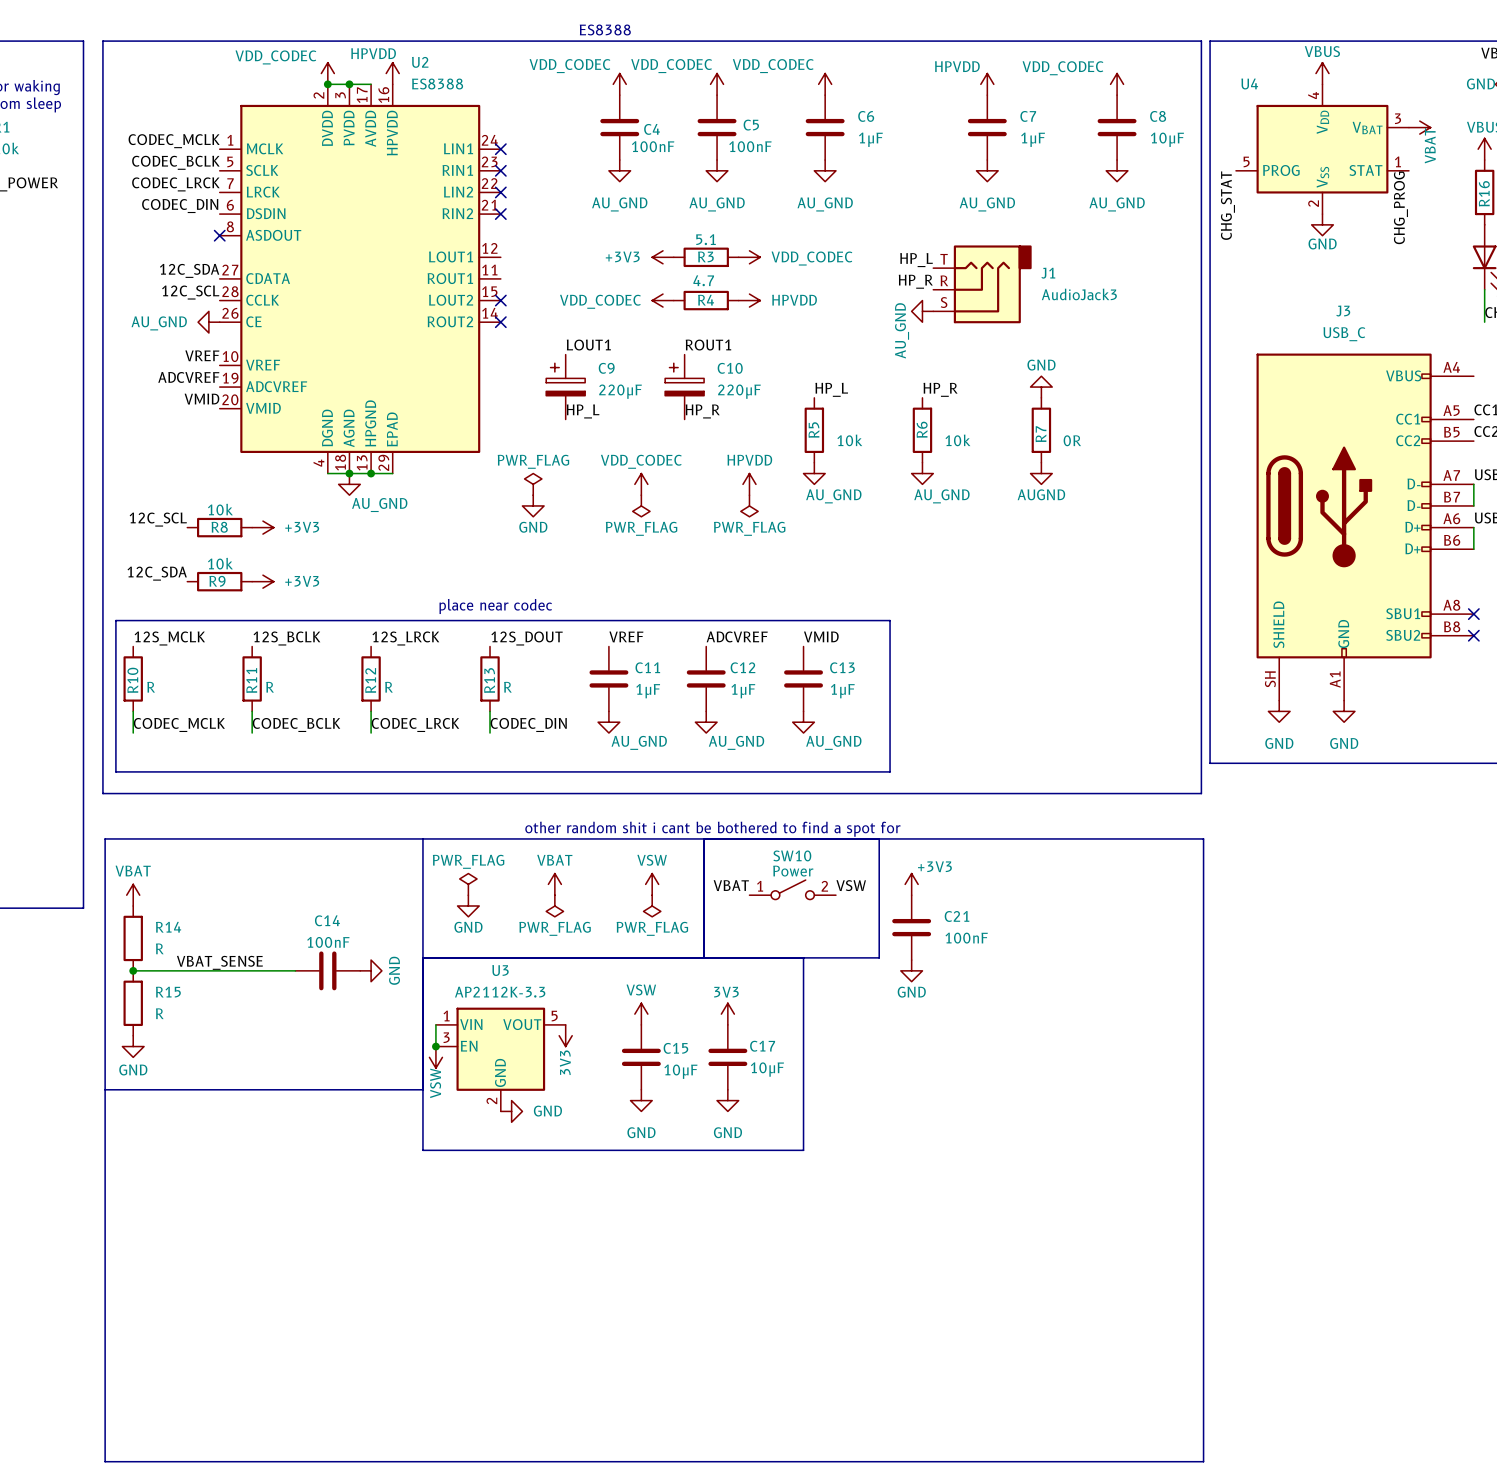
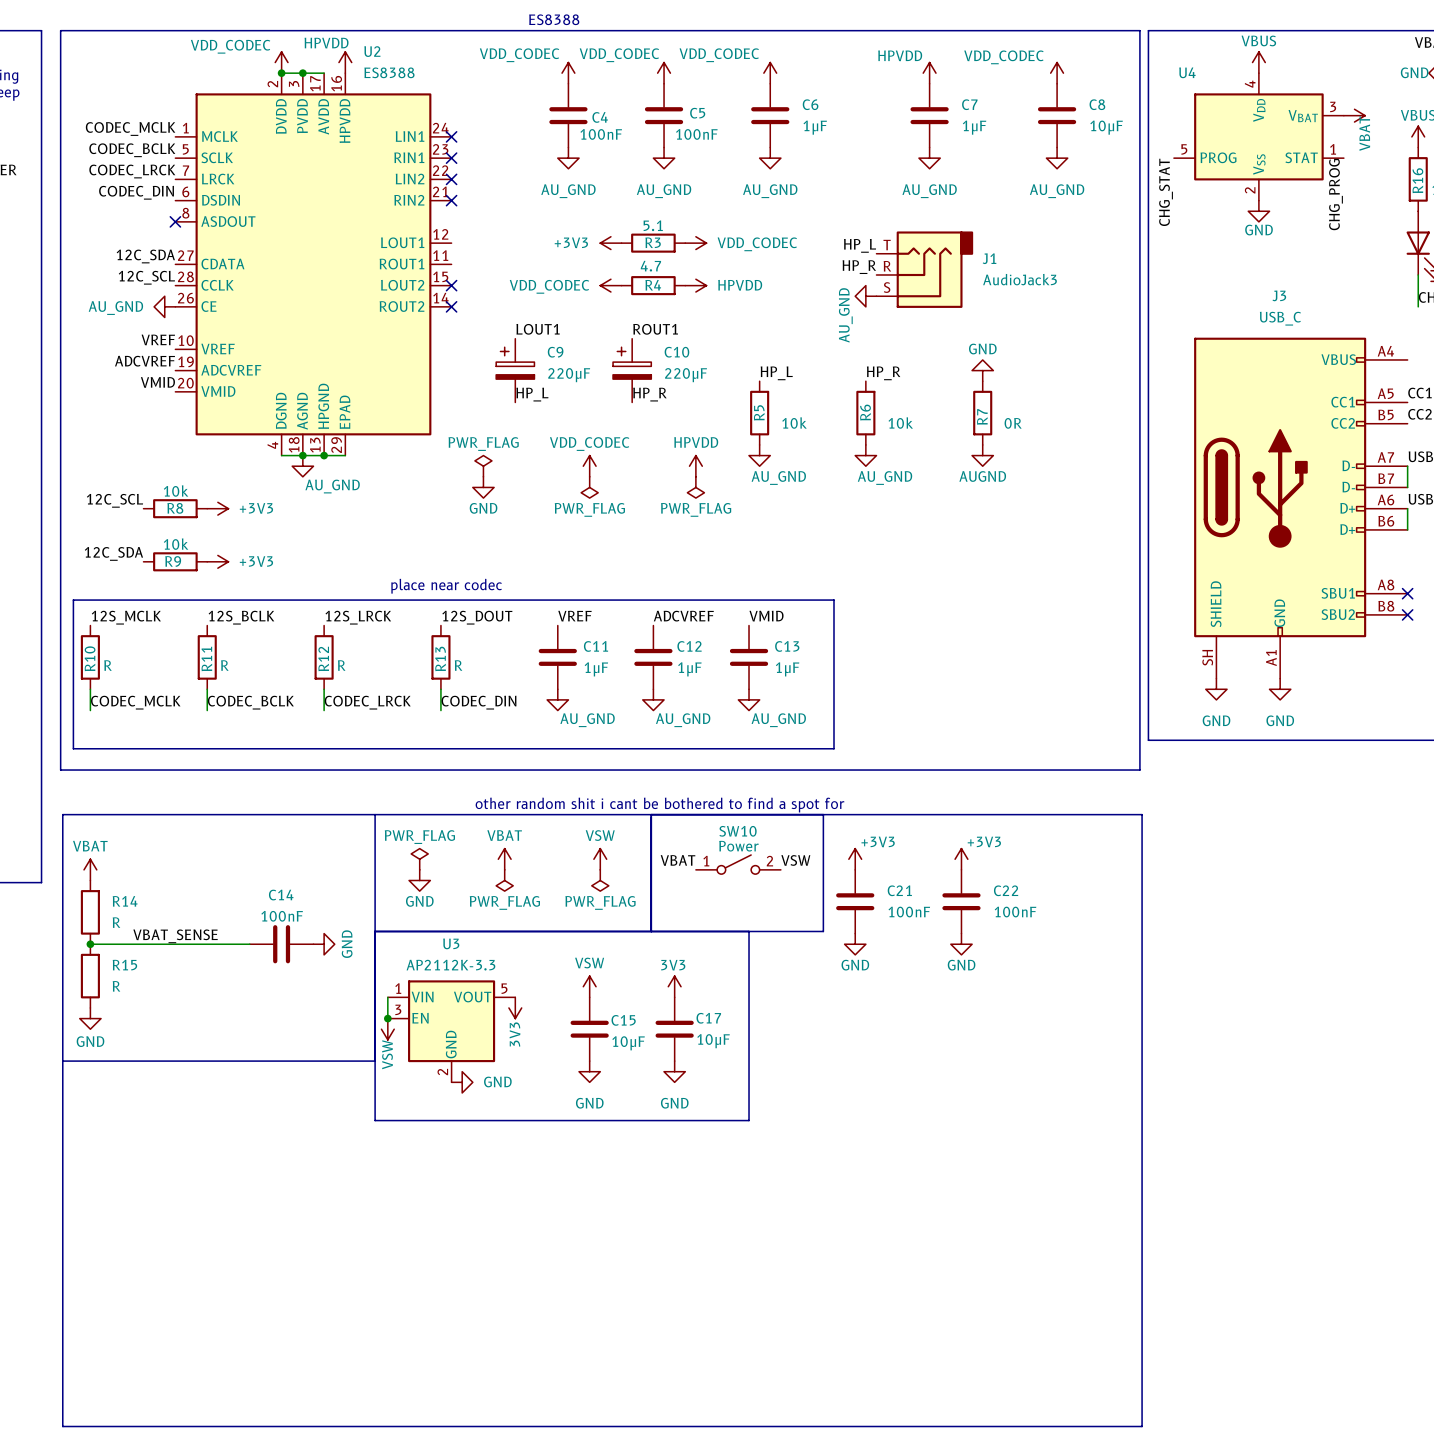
power symbol: none -> +3V3 (961, 859)
C22: none -> 100nF (961, 901)
power symbol: none -> GND (961, 944)

